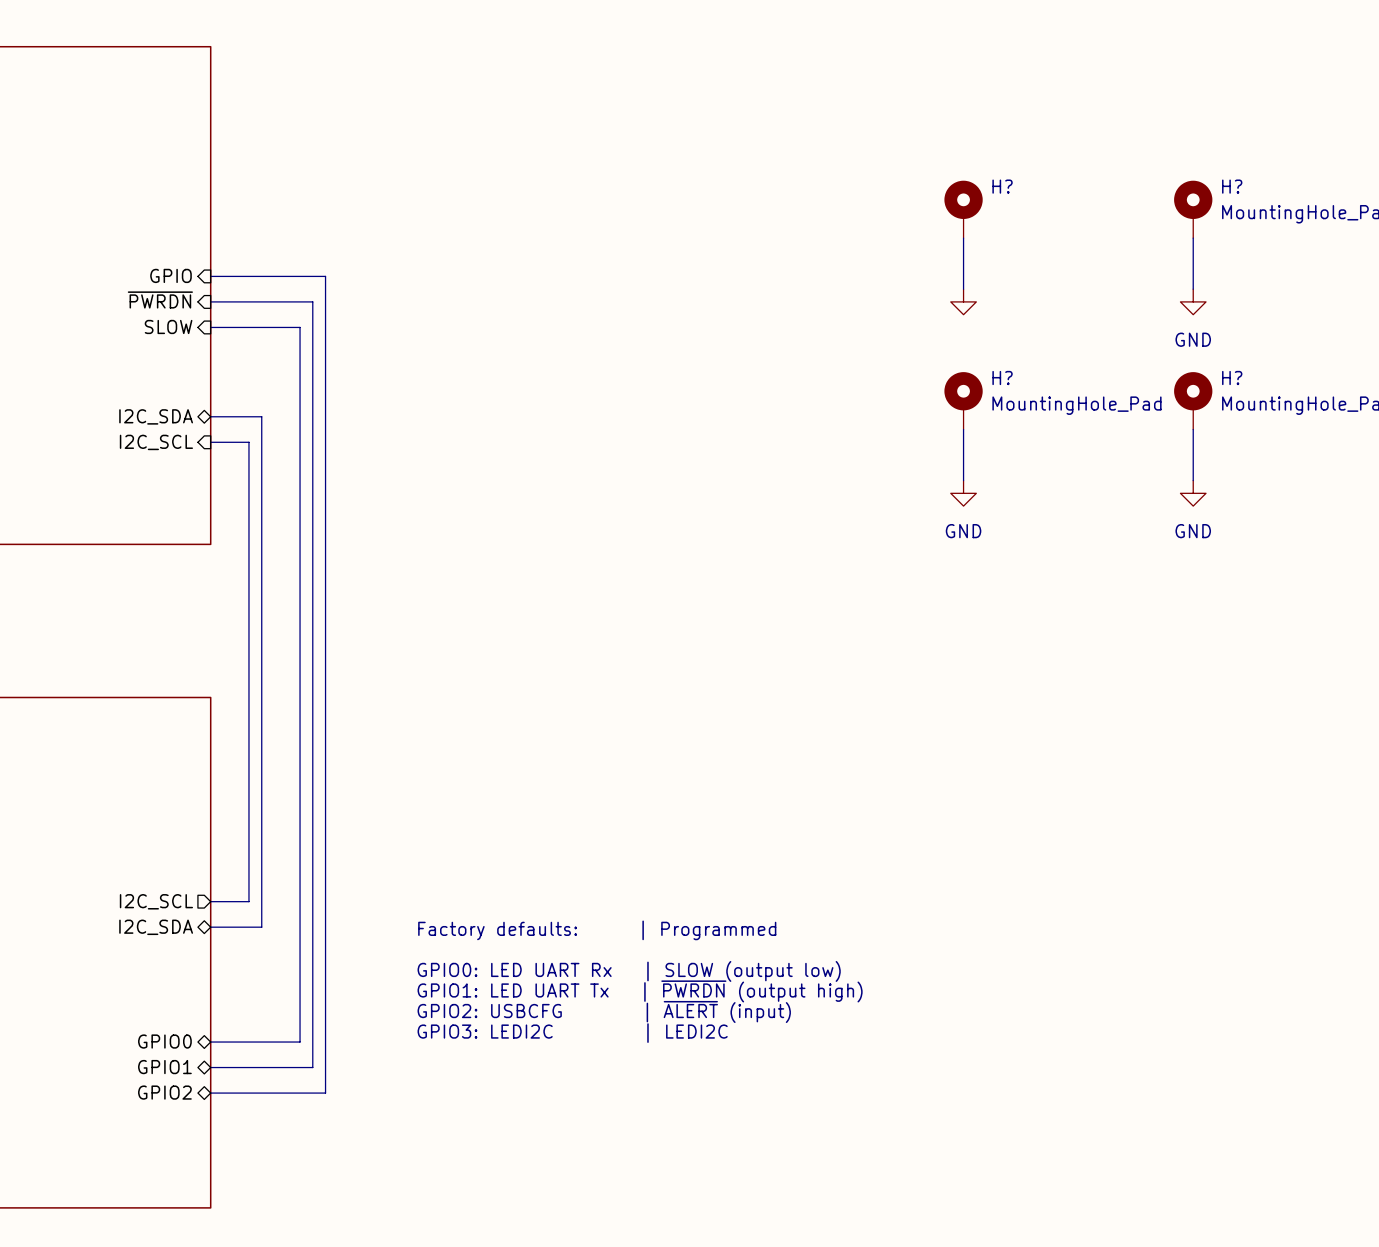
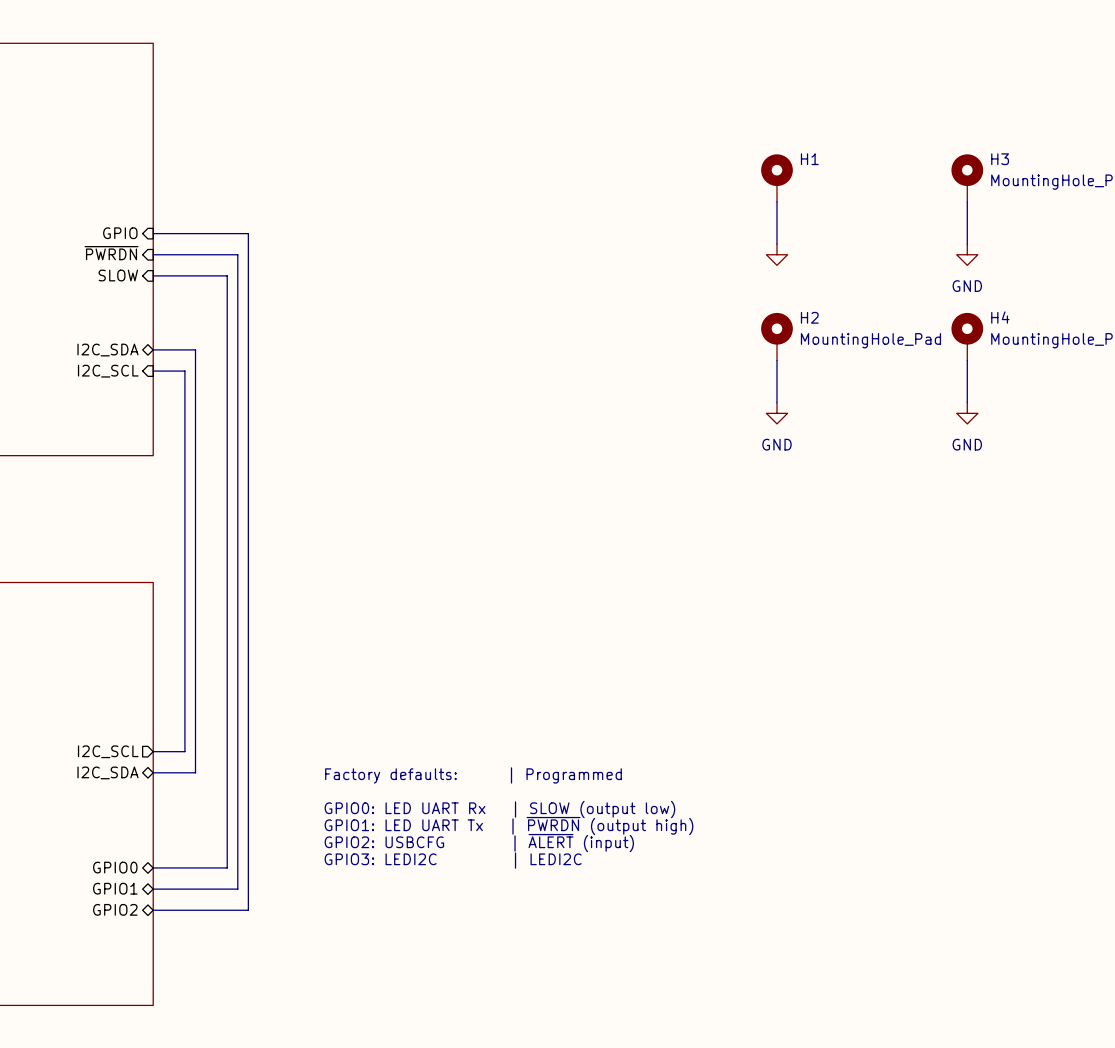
H? name: H? (1002, 186) -> H1 (809, 159)
H? name: H? (1232, 186) -> H3 (1000, 159)
H? name: H? (1002, 378) -> H2 (809, 317)
H? name: H? (1232, 378) -> H4 (1000, 317)

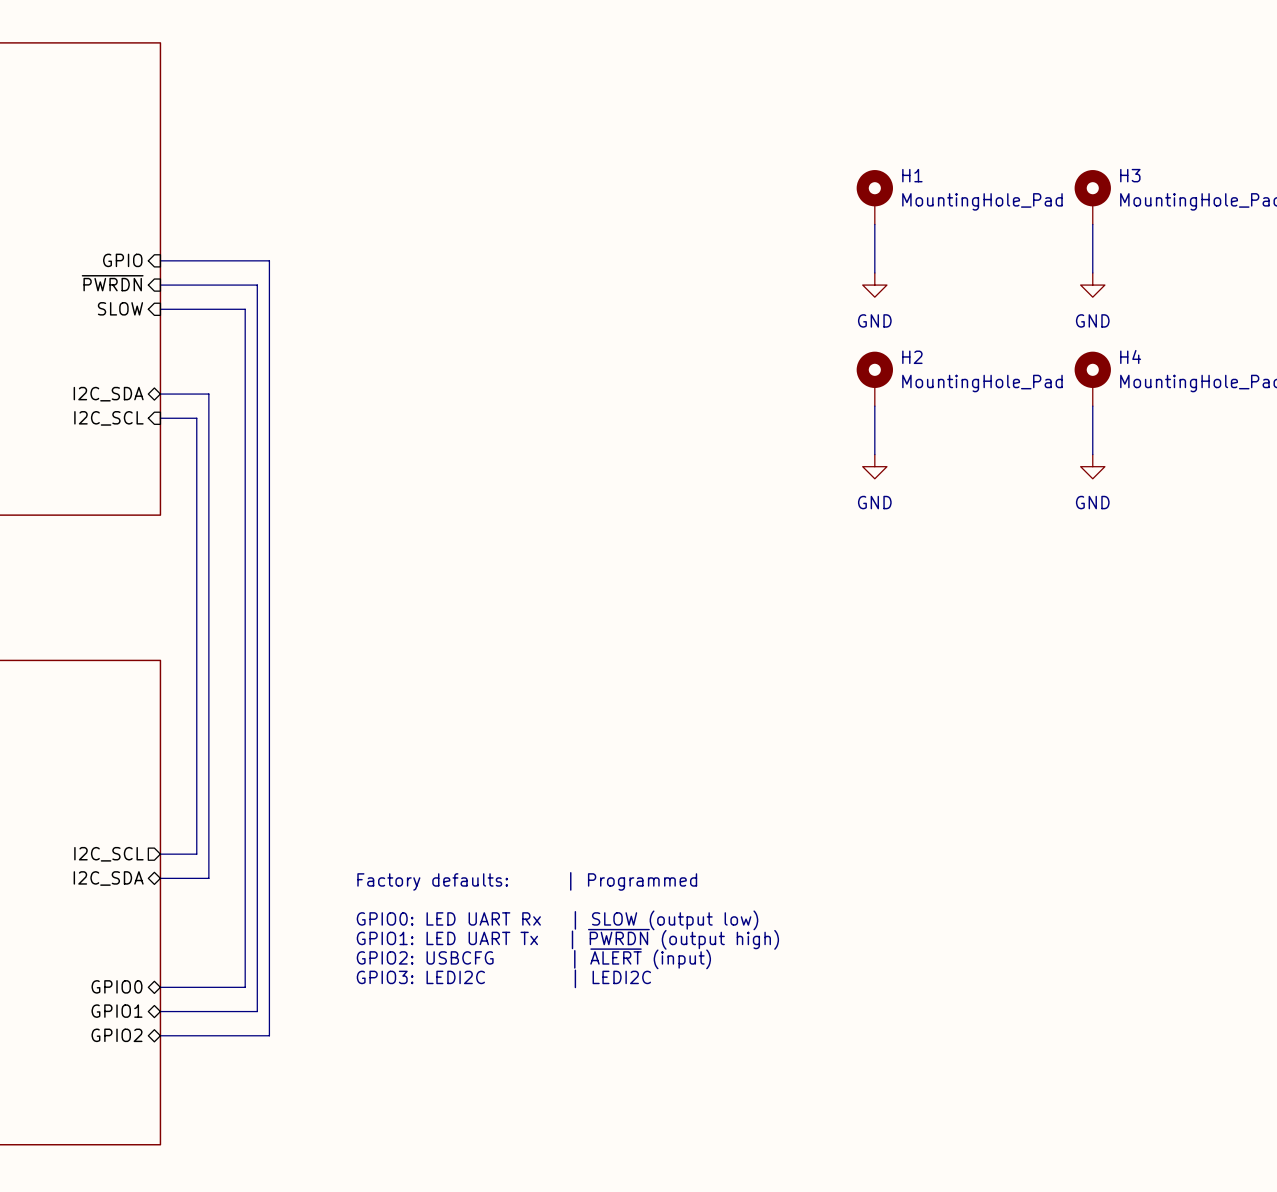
H1 value: none -> MountingHole_Pad (982, 201)
power symbol text: none -> GND (874, 320)

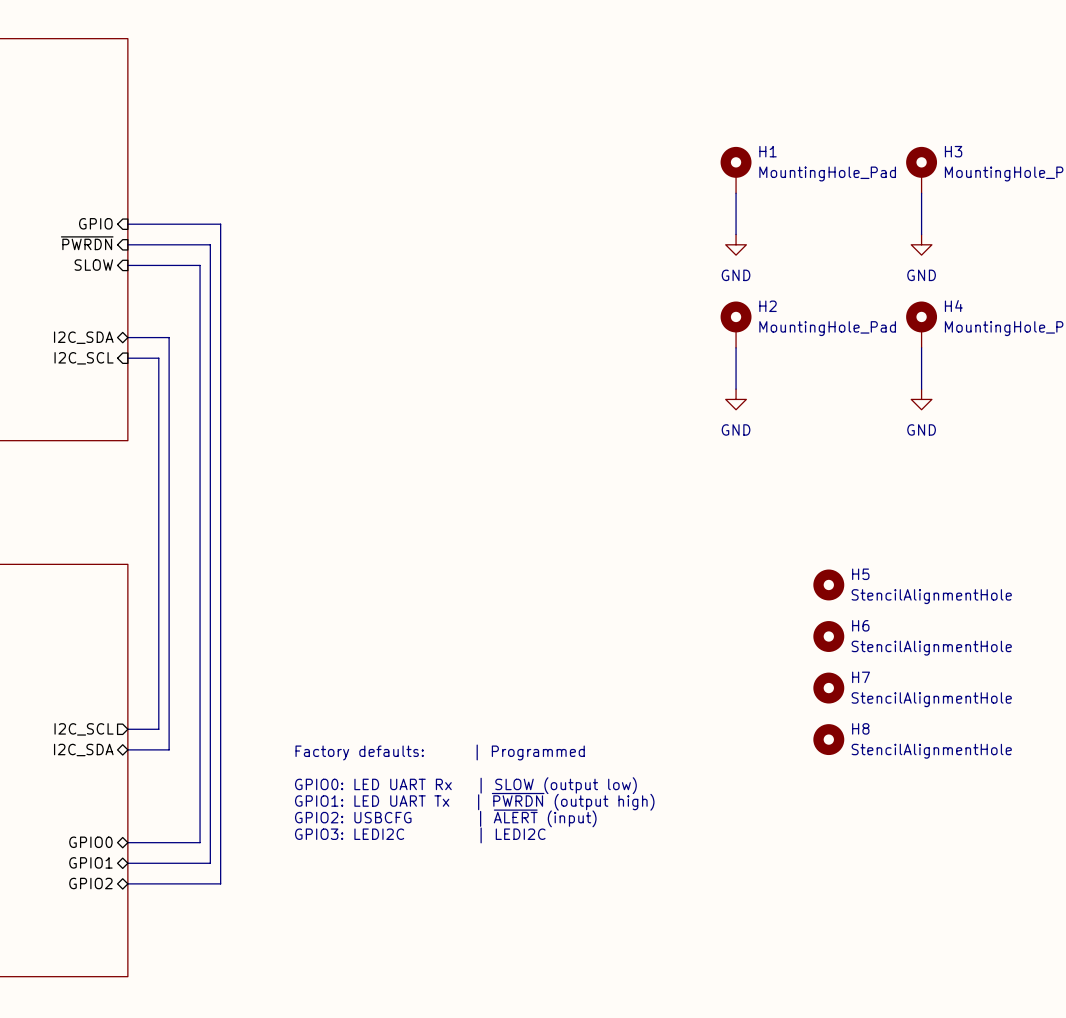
H5: none -> StencilAlignmentHole (828, 584)
H6: none -> StencilAlignmentHole (828, 636)
H7: none -> StencilAlignmentHole (828, 688)
H8: none -> StencilAlignmentHole (828, 739)

